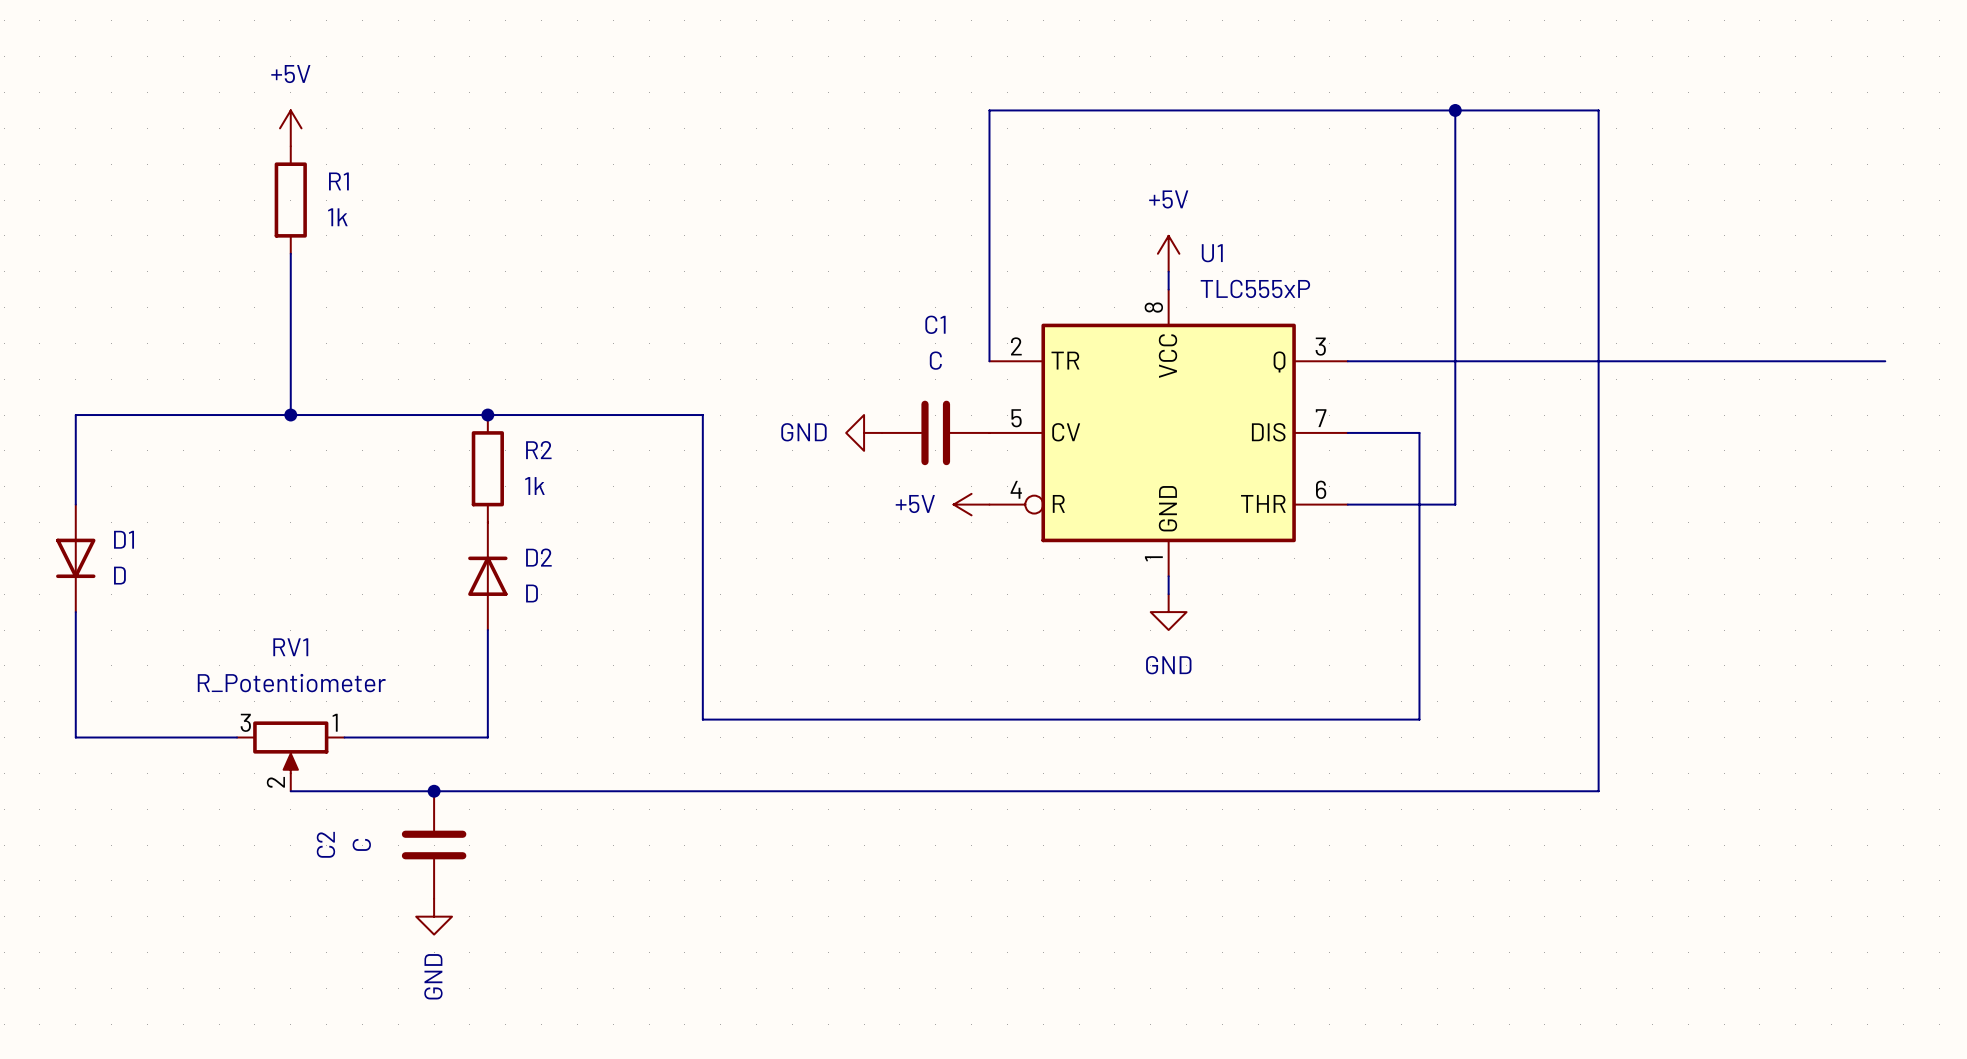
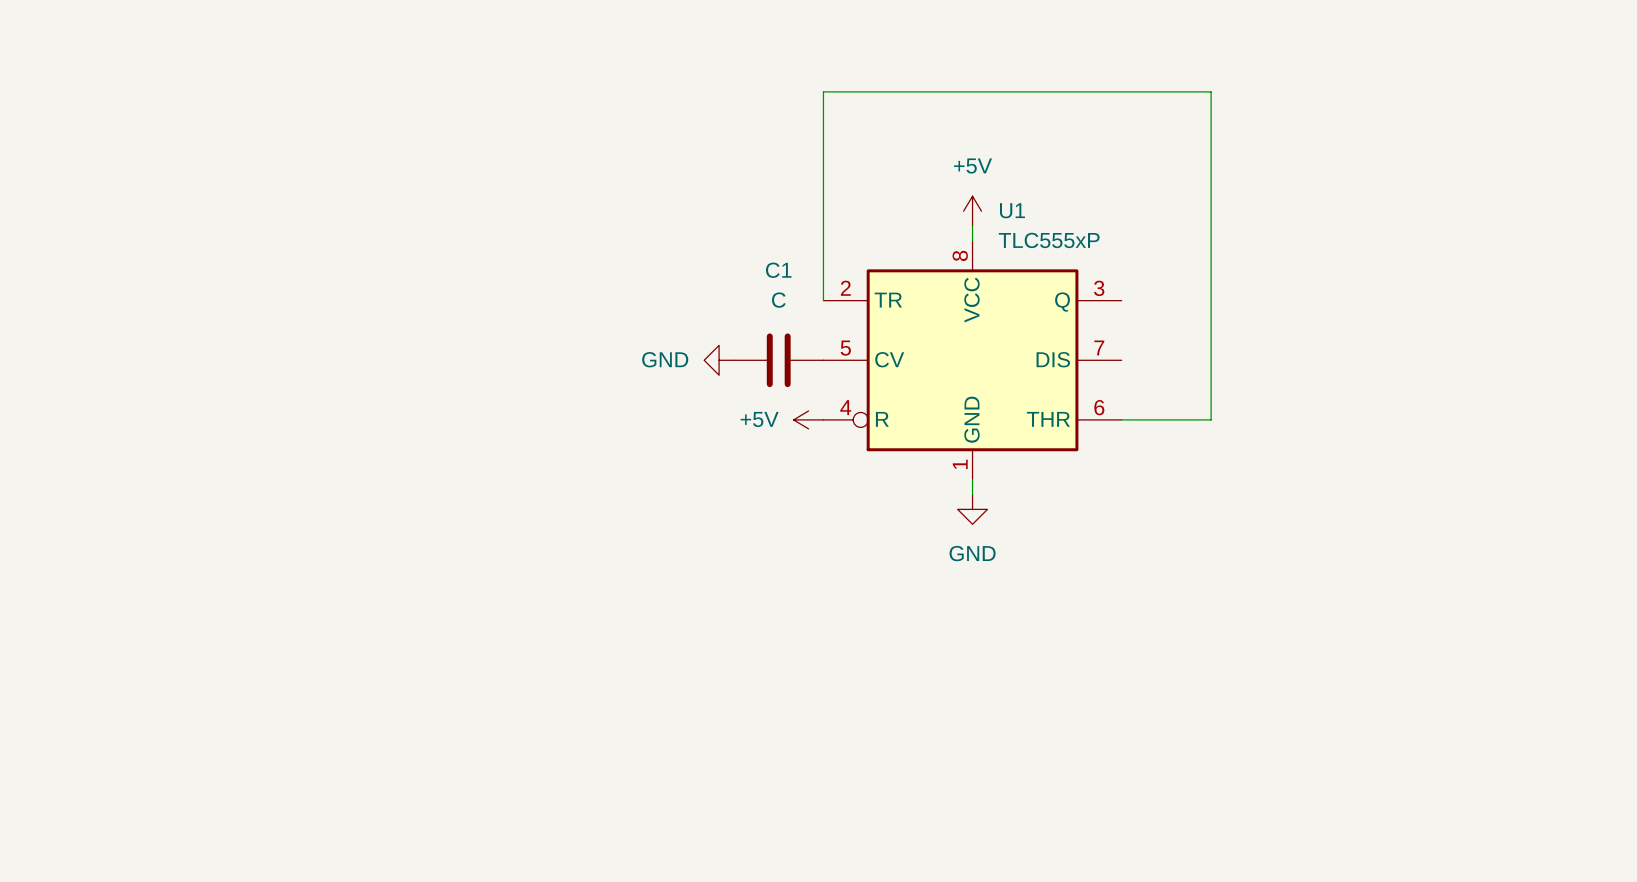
wire: (1455, 110) (1598, 110) (1598, 791) (290, 791) -> none
junction: (1455, 110) -> none
power symbol: +5V (290, 128) -> none
R1: 1k (290, 200) -> none
wire: (290, 253) (290, 415) -> none
wire: (1347, 361) (1885, 361) -> none
junction: (290, 415) -> none
junction: (487, 415) -> none
wire: (1347, 432) (1419, 432) (1419, 719) (702, 719) (702, 415) (75, 415) (75, 504) -> none
R2: 1k (487, 468) -> none
D1: D (75, 558) -> none
D2: D (487, 576) -> none
wire: (75, 612) (75, 737) (237, 737) -> none
wire: (487, 630) (487, 737) (344, 737) -> none
RV1: R_Potentiometer (290, 756) -> none
junction: (434, 791) -> none
C2: C (434, 845) -> none
power symbol: GND (434, 916) -> none

